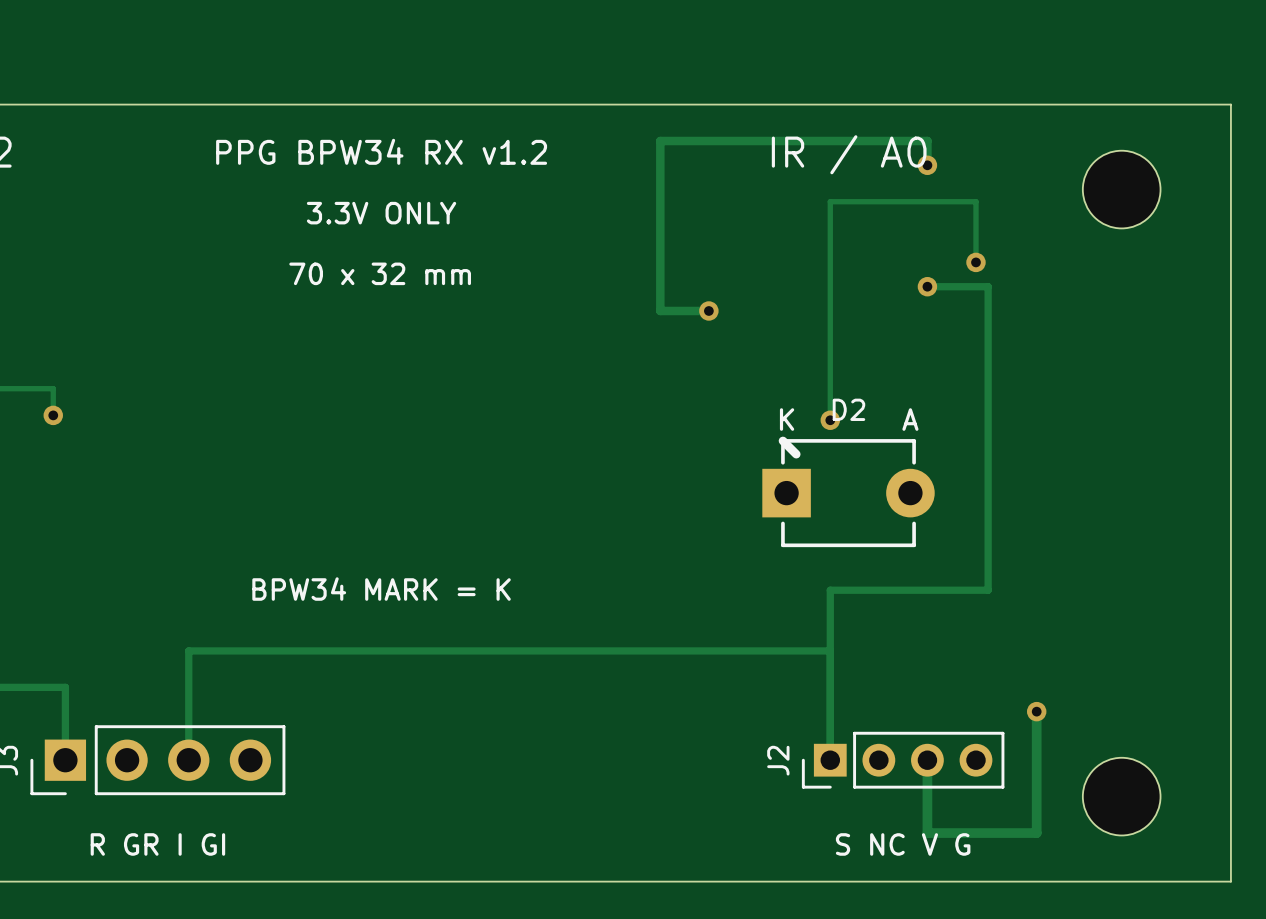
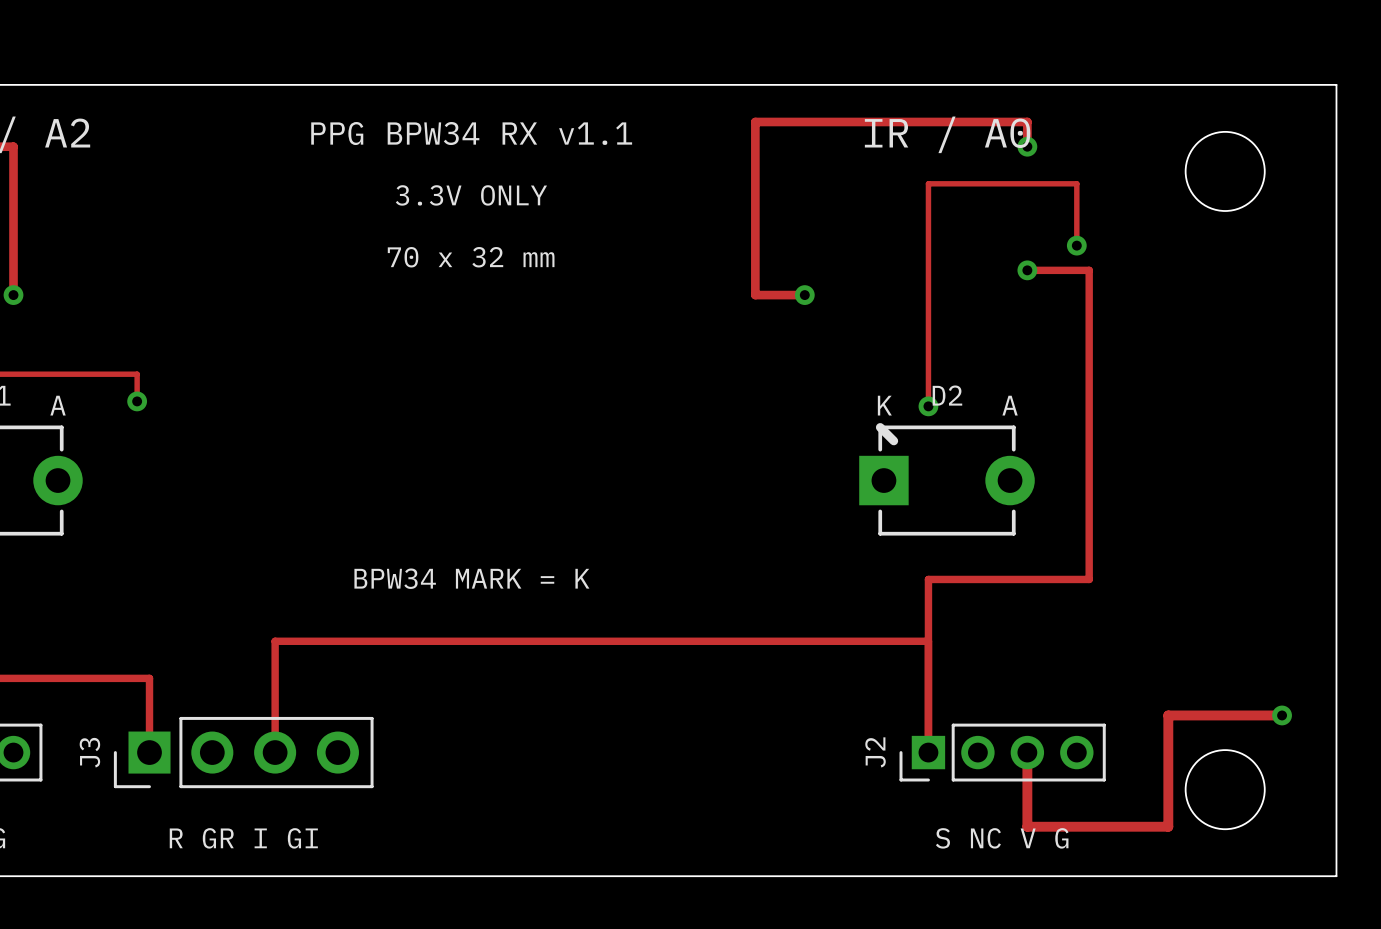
text: PPG BPW34 RX v1.2 (381, 151) -> PPG BPW34 RX v1.1 (471, 133)
track: (1036, 711) (1036, 833) -> (1282, 715) (1168, 715) (1168, 826) (1138, 826)
via position: (1036, 711) -> (1282, 715)

